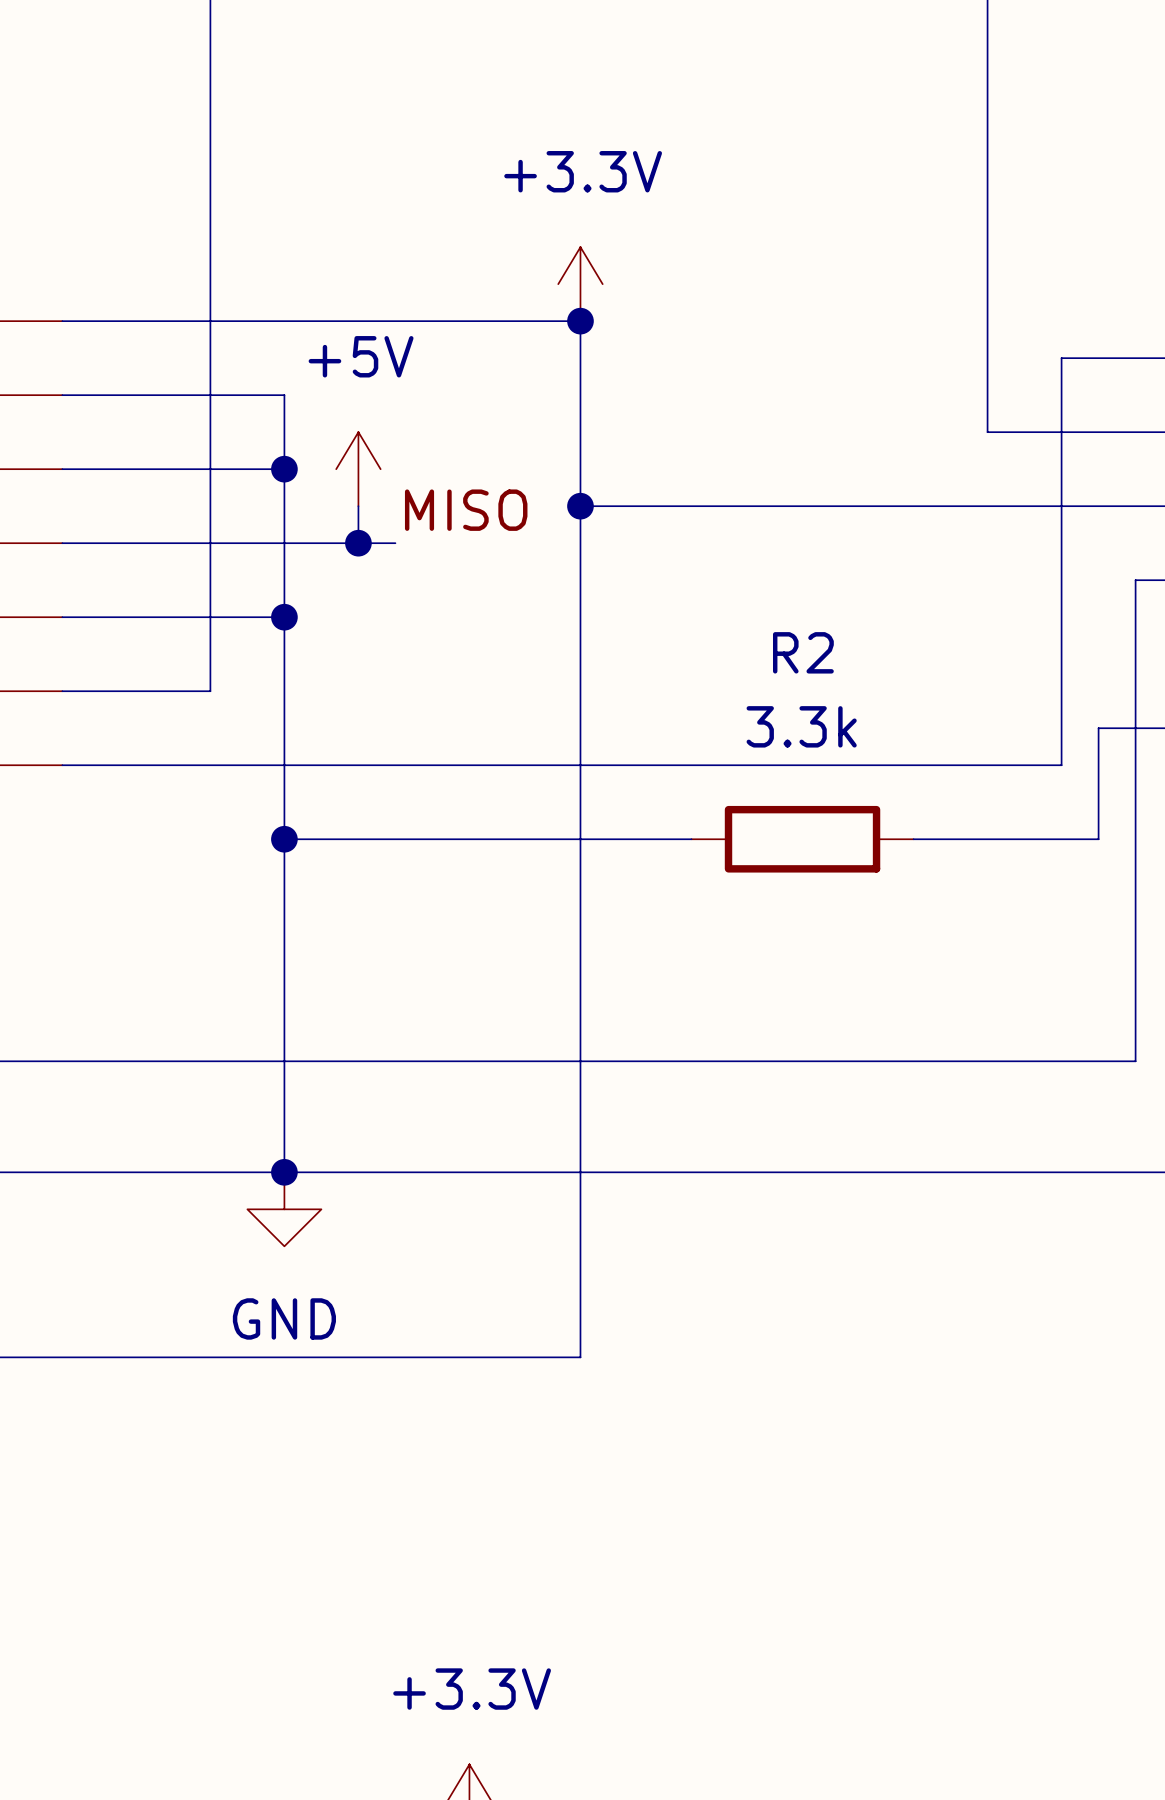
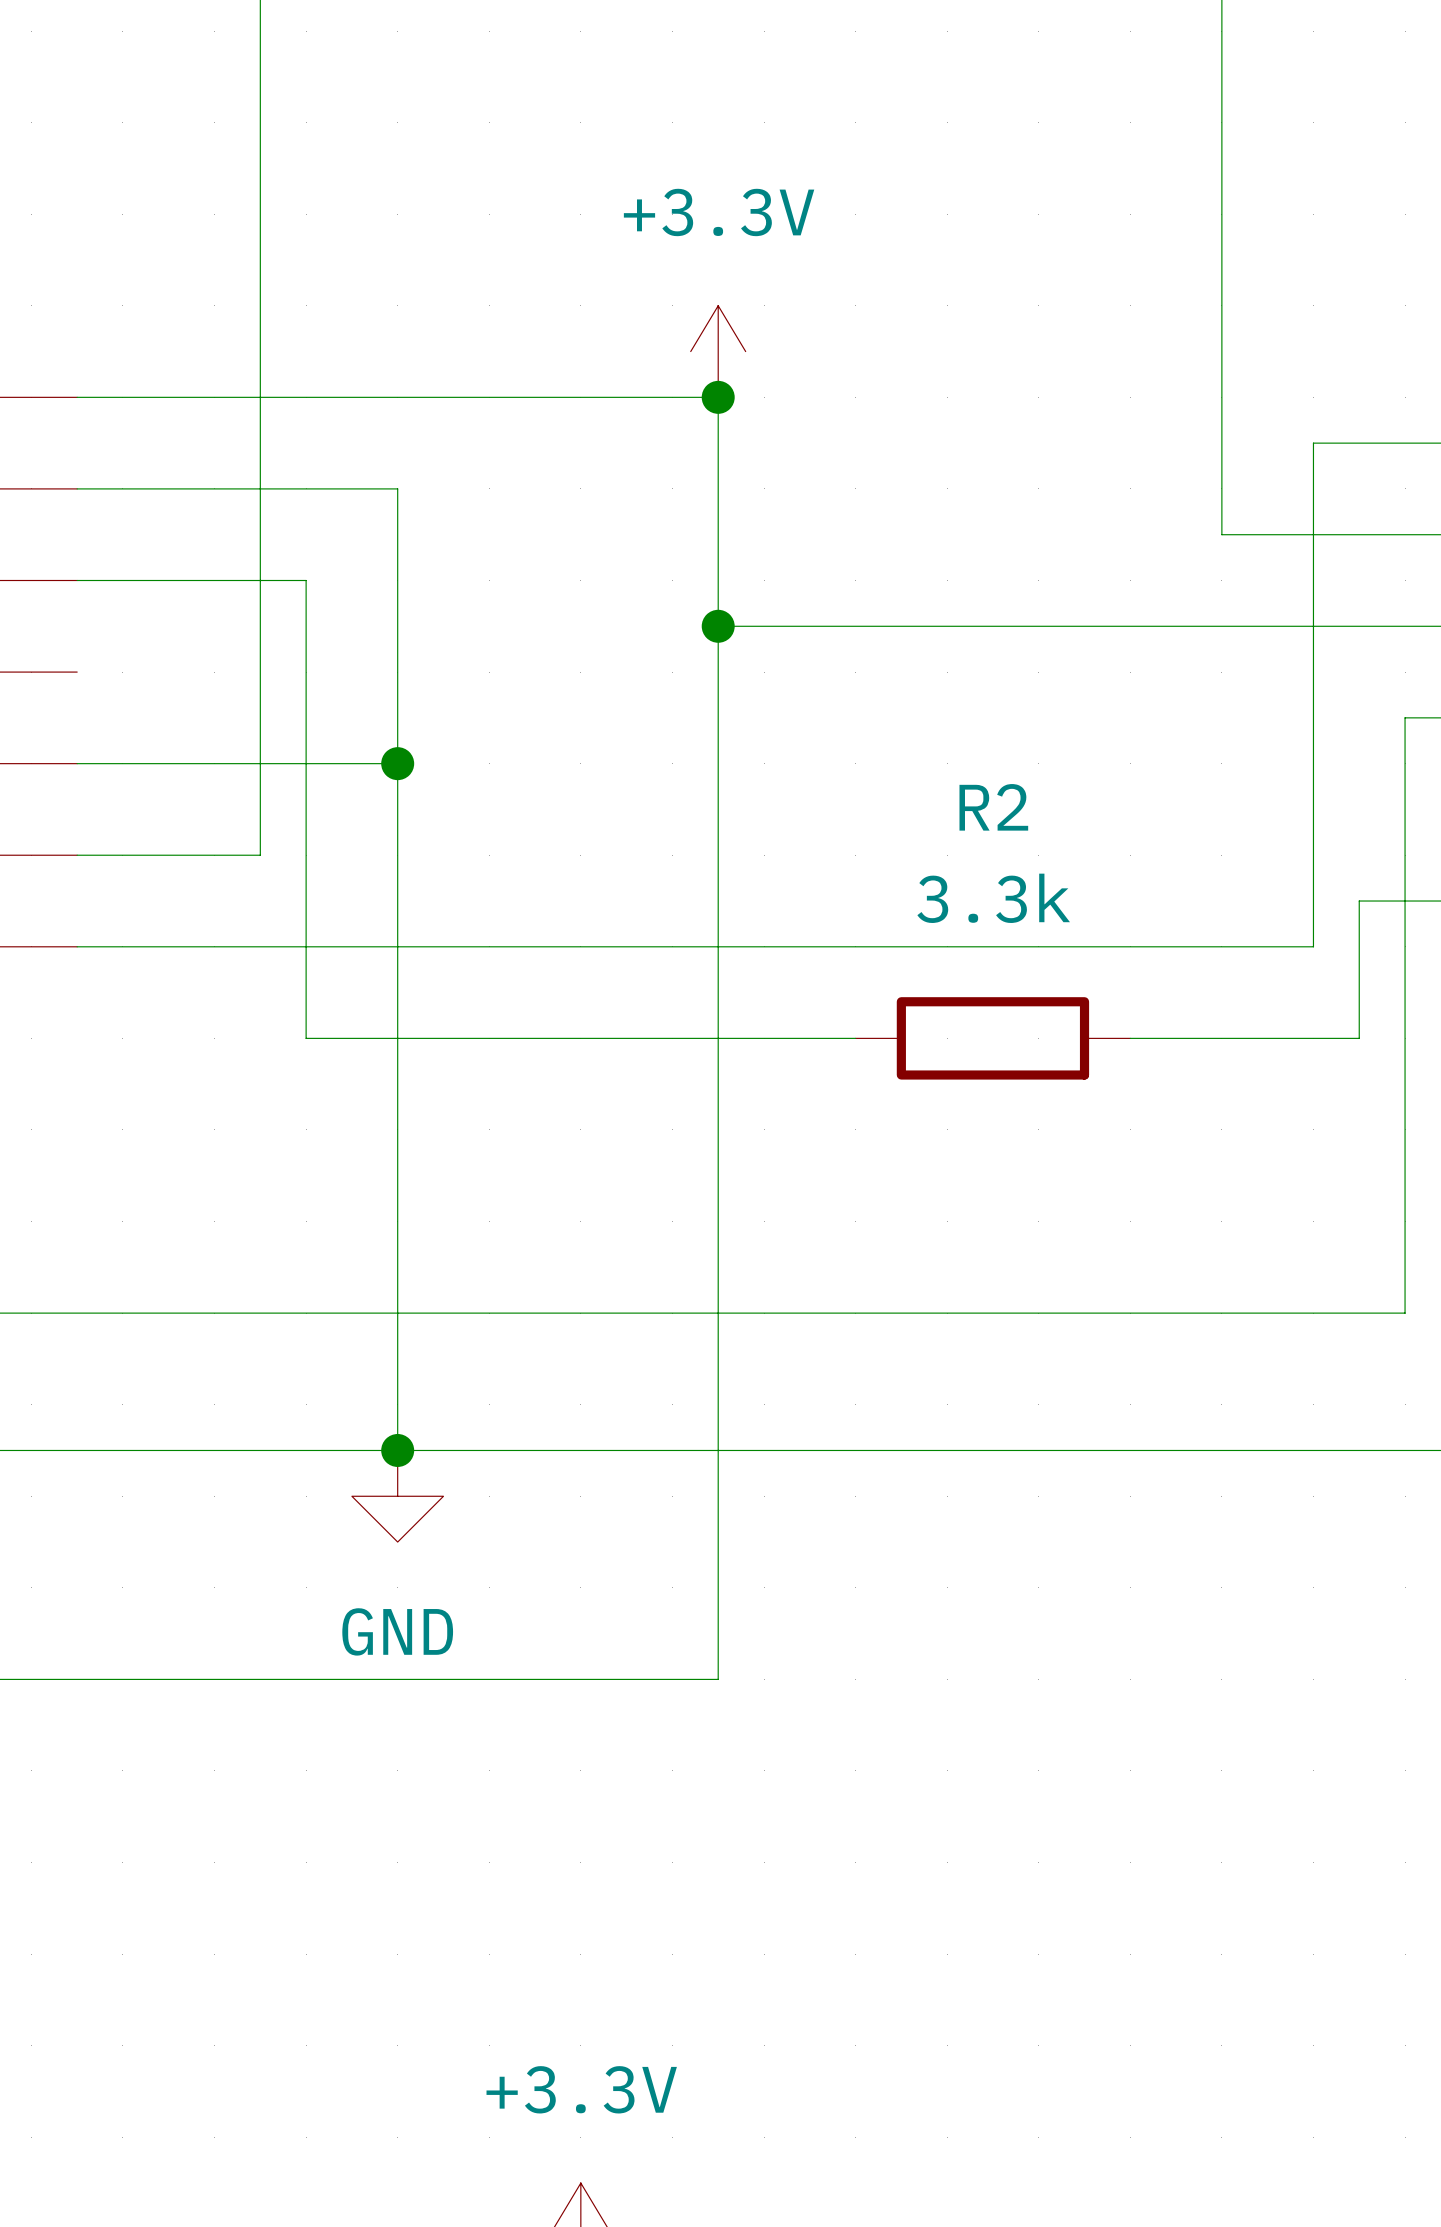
wire: (284, 395) (284, 1172) -> (351, 488) (397, 488) (397, 1450)
wire: (247, 469) (284, 469) -> (306, 580) (306, 1038) (351, 1038)
junction: (284, 469) -> none
power symbol: +5V (358, 469) -> none
wire: (358, 506) (358, 543) -> none
label: MISO (466, 510) -> none
wire: (62, 543) (395, 543) -> none
junction: (358, 543) -> none
wire: none -> (351, 763) (397, 763)
junction position: (284, 617) -> (397, 763)
junction: (284, 839) -> none
junction position: (284, 1172) -> (397, 1450)
power symbol position: GND (284, 1209) -> GND (397, 1496)

